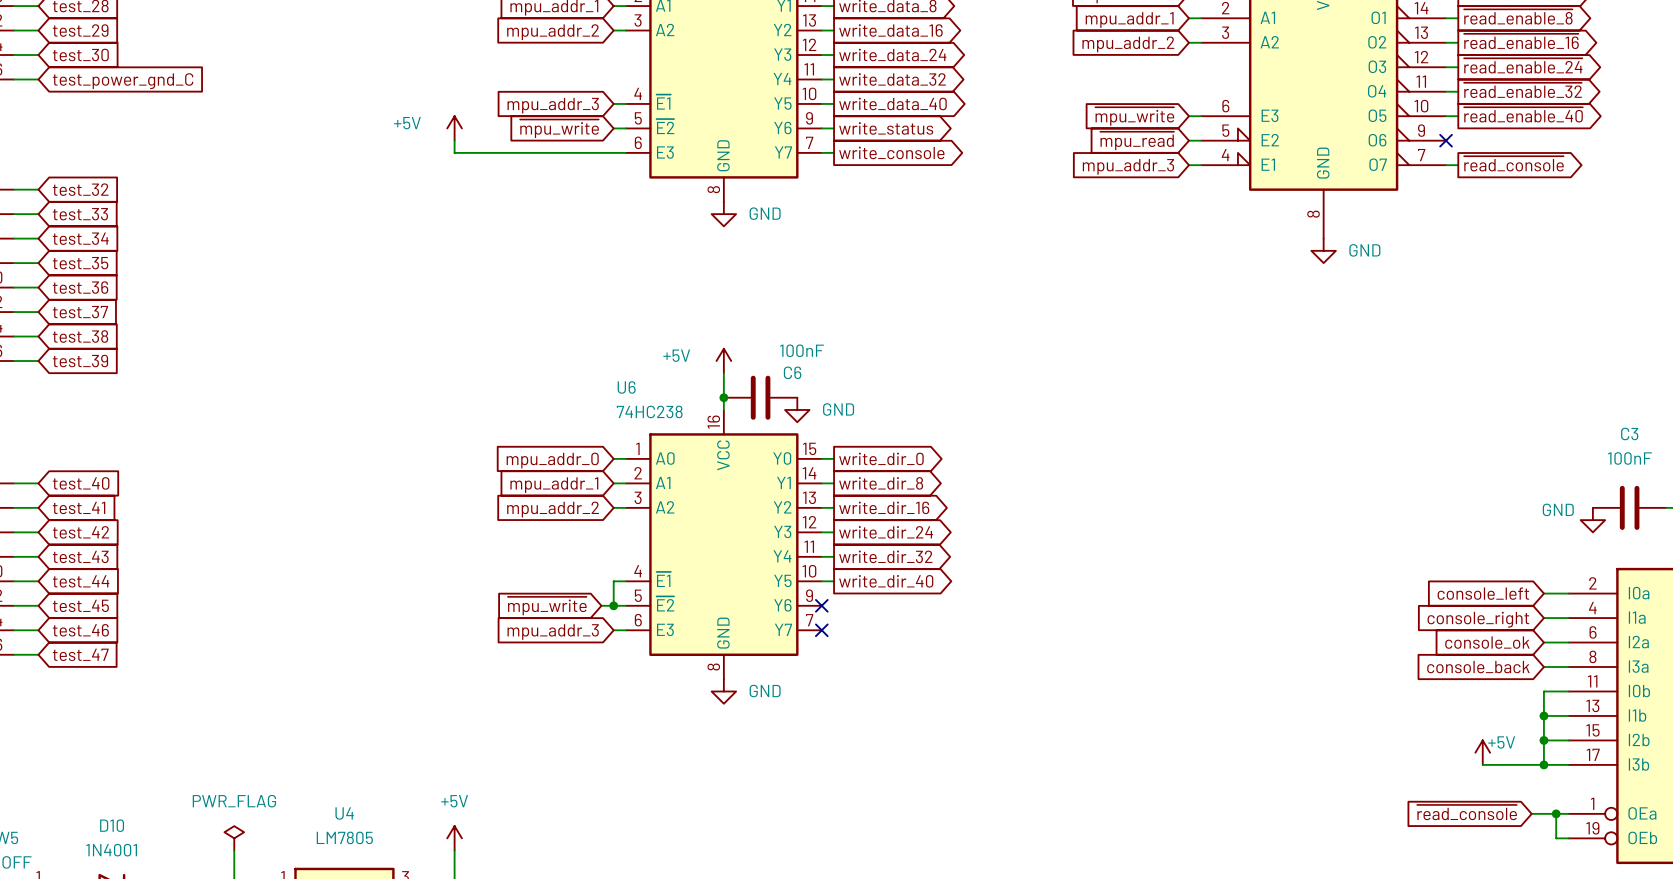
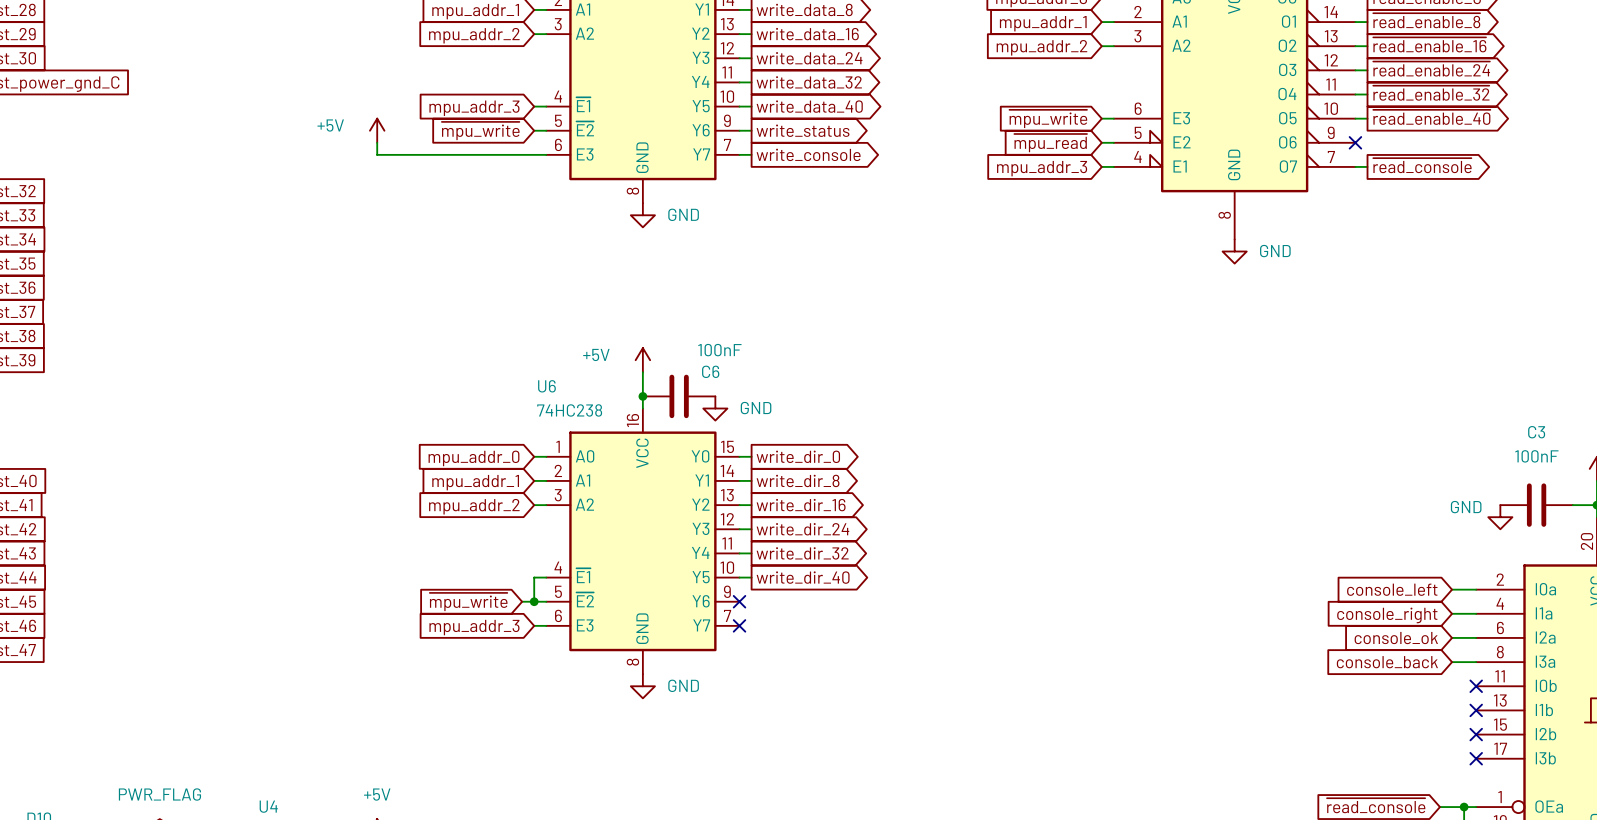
wire: (1568, 691) (1543, 691) (1543, 764) -> none
no-connect mark: none -> (1476, 686)
wire: (1543, 715) (1568, 715) -> none
junction: (1543, 715) -> none
no-connect mark: none -> (1476, 710)
wire: (1543, 740) (1568, 740) -> none
junction: (1543, 740) -> none
no-connect mark: none -> (1476, 734)
power symbol: +5V (1482, 752) -> none
wire: (1482, 764) (1568, 764) -> none
junction: (1543, 764) -> none
no-connect mark: none -> (1476, 758)

